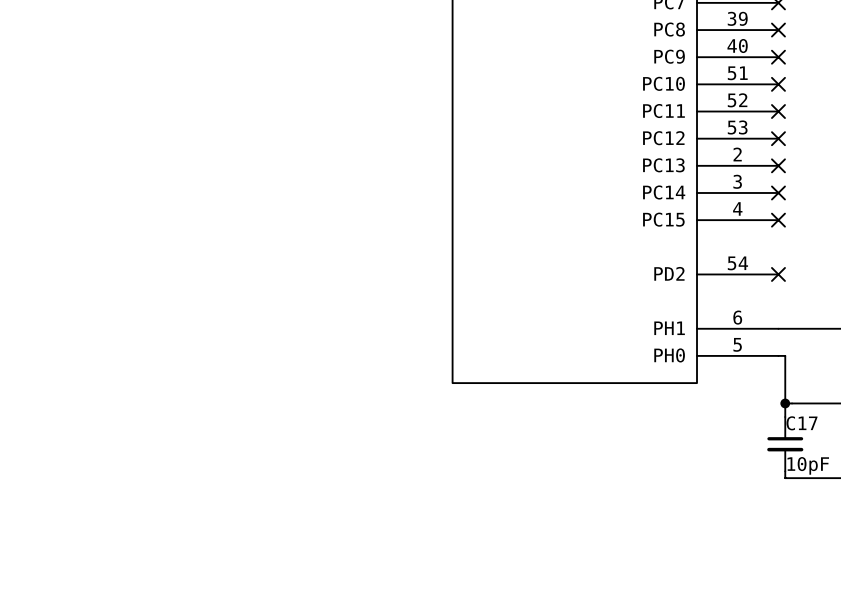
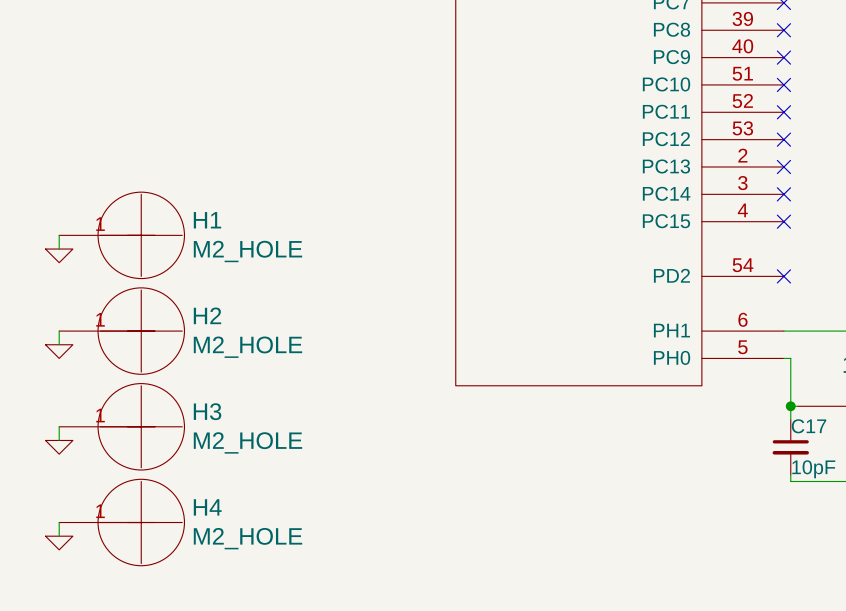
wire: none -> (59, 235) (59, 249)
H1: none -> M2_HOLE (121, 235)
power symbol: none -> (59, 255)
wire: none -> (59, 331) (59, 344)
H2: none -> M2_HOLE (121, 331)
power symbol: none -> (59, 351)
wire: none -> (59, 426) (59, 440)
H3: none -> M2_HOLE (121, 426)
power symbol: none -> (59, 447)
wire: none -> (59, 522) (59, 536)
H4: none -> M2_HOLE (121, 522)
power symbol: none -> (59, 543)

